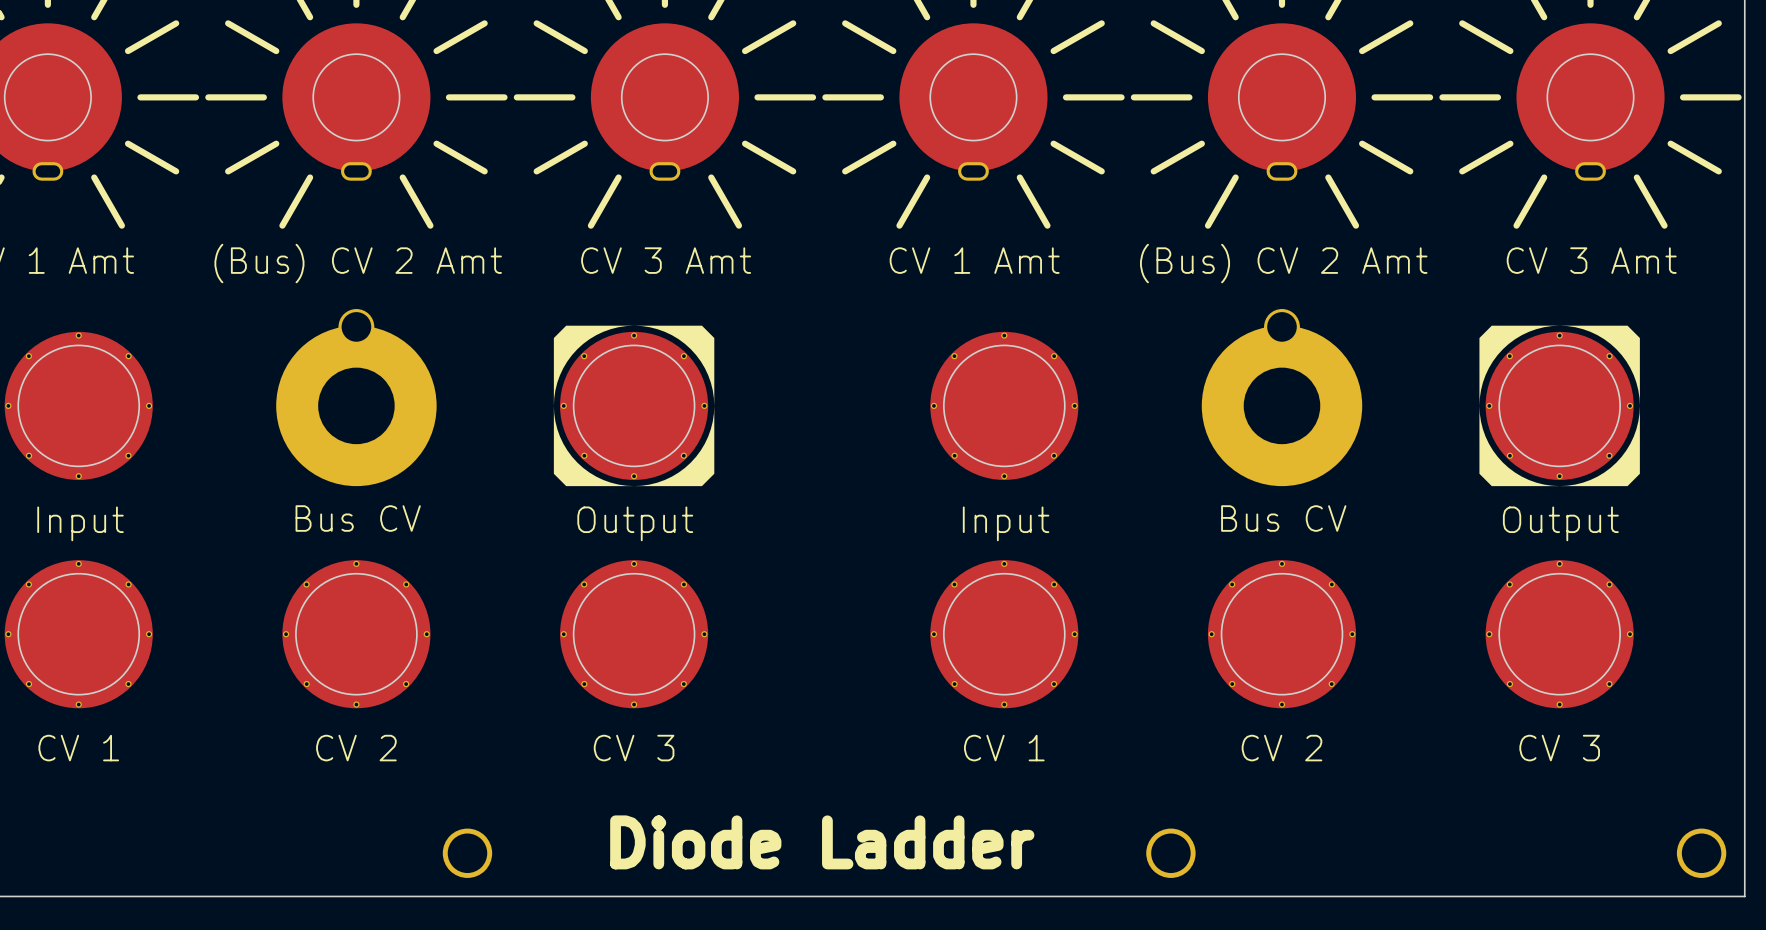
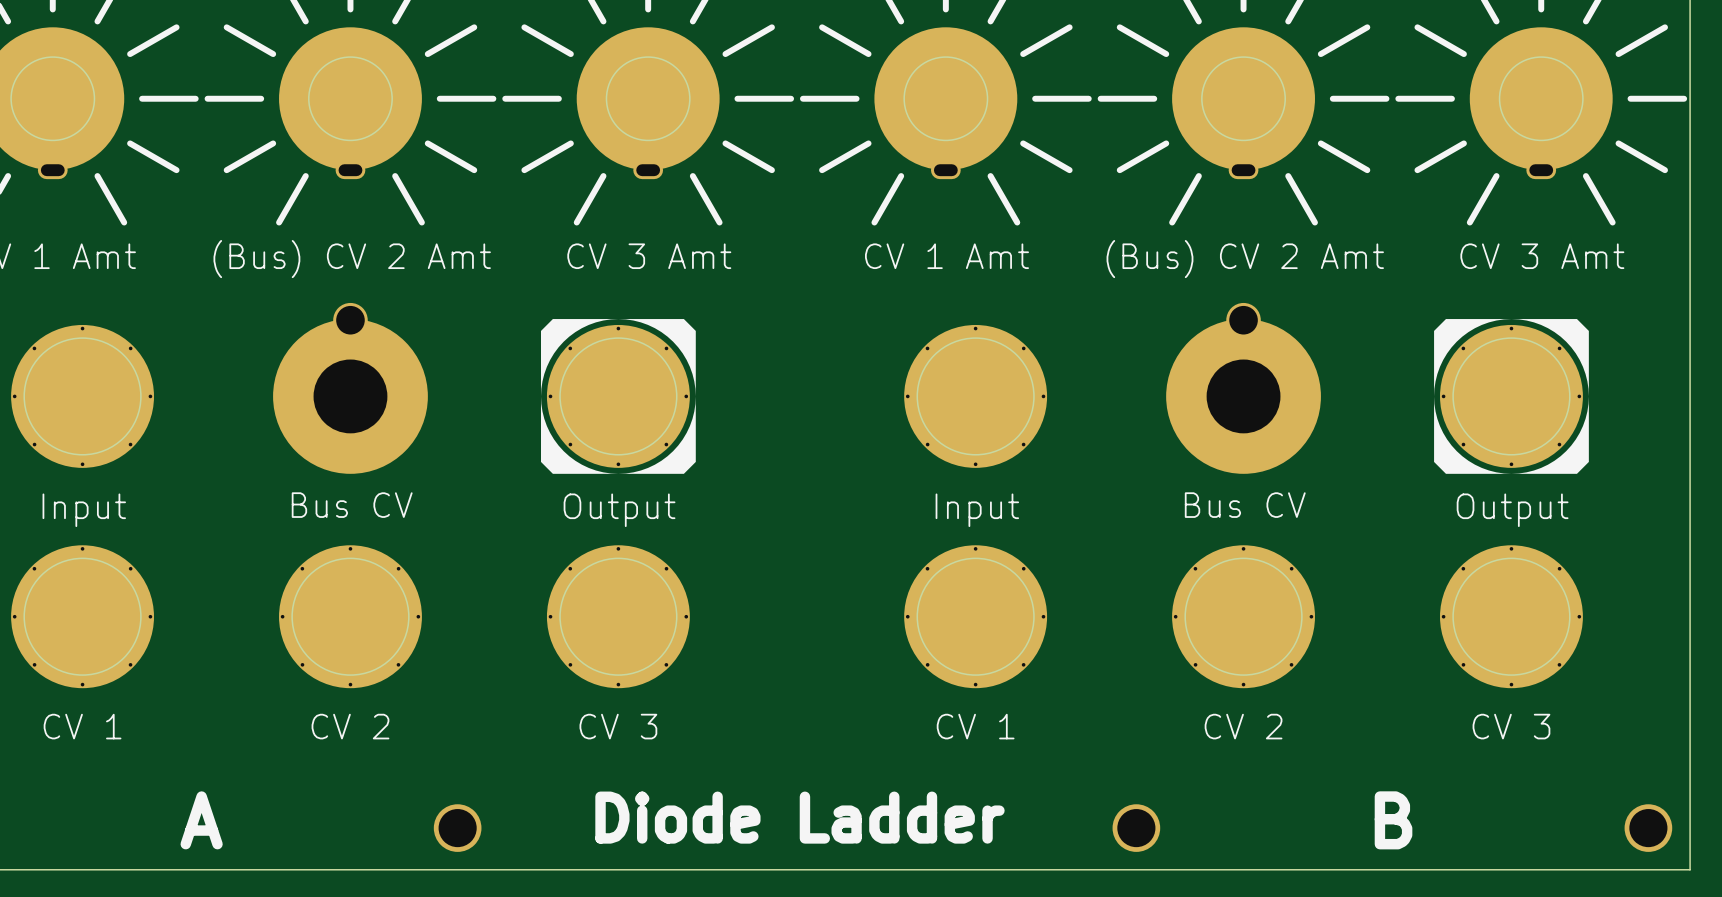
text: none -> A (201, 820)
text: none -> B (1393, 820)

